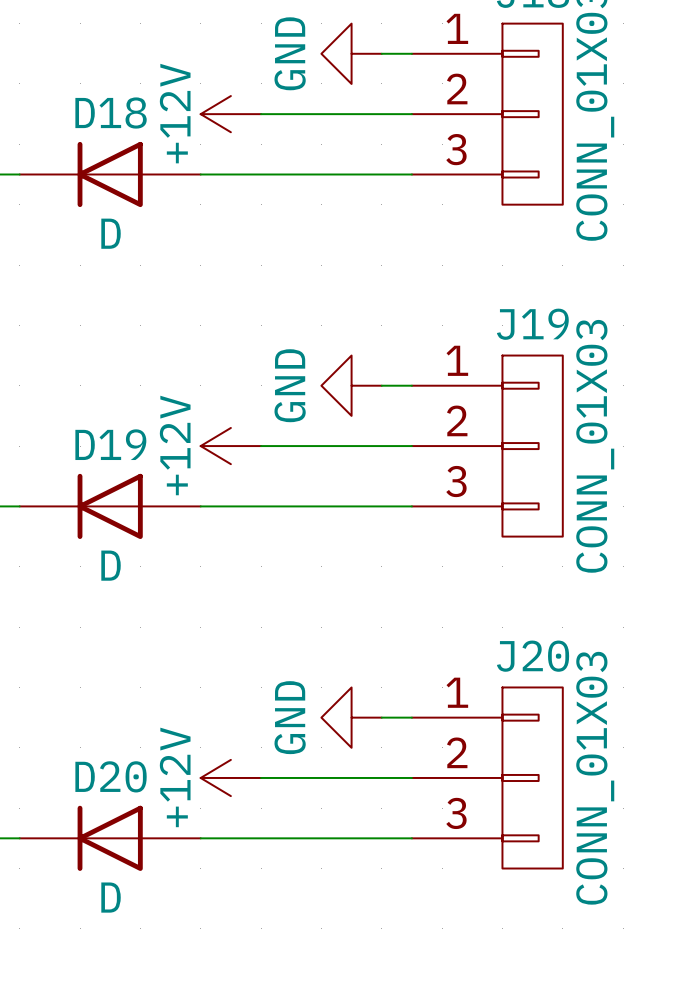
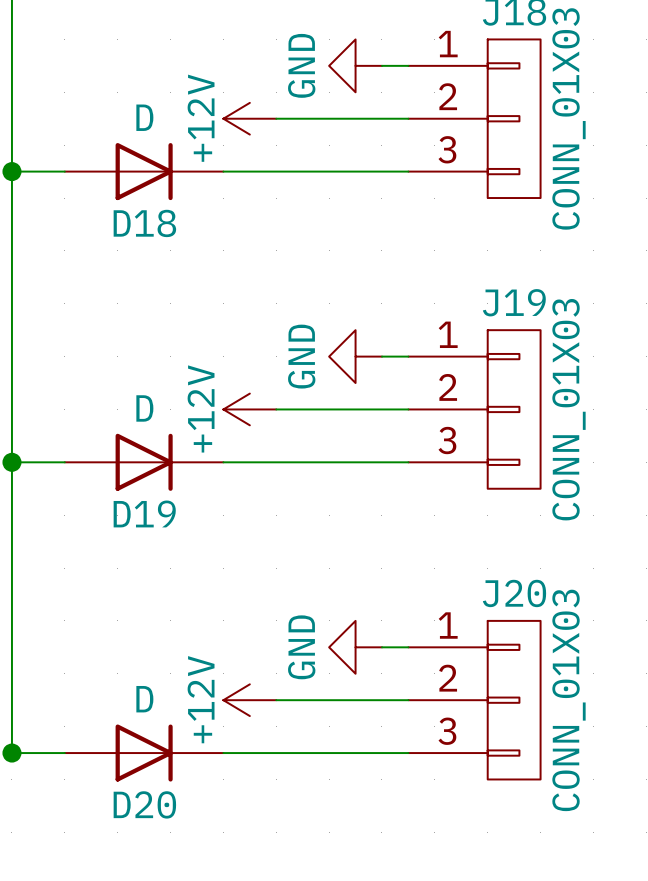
D18 rotation: 0° (110, 174) -> 180° (144, 171)
D19 rotation: 0° (110, 506) -> 180° (144, 462)
D20 rotation: 0° (110, 838) -> 180° (144, 753)

